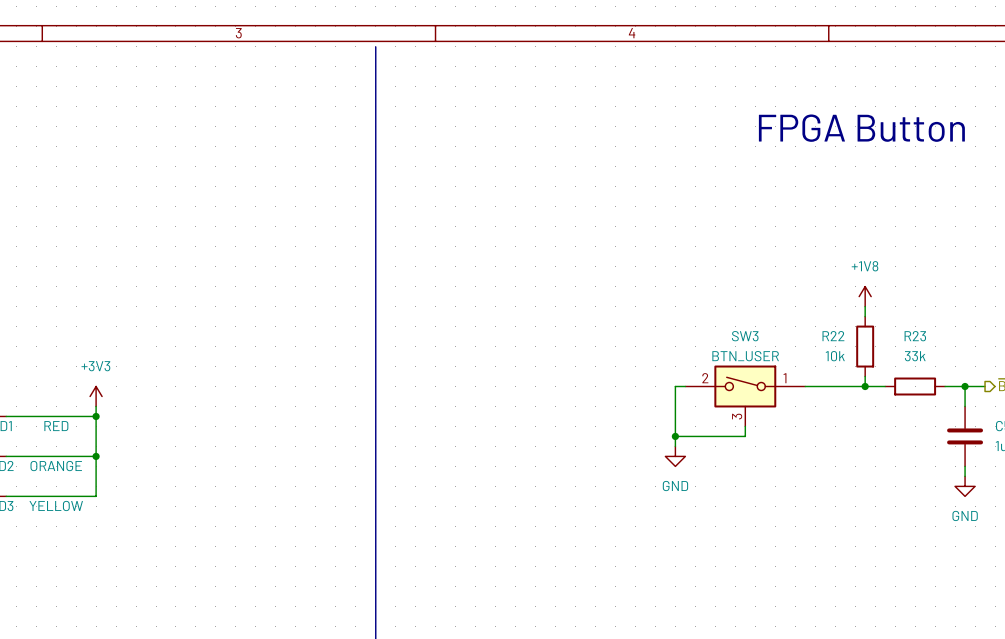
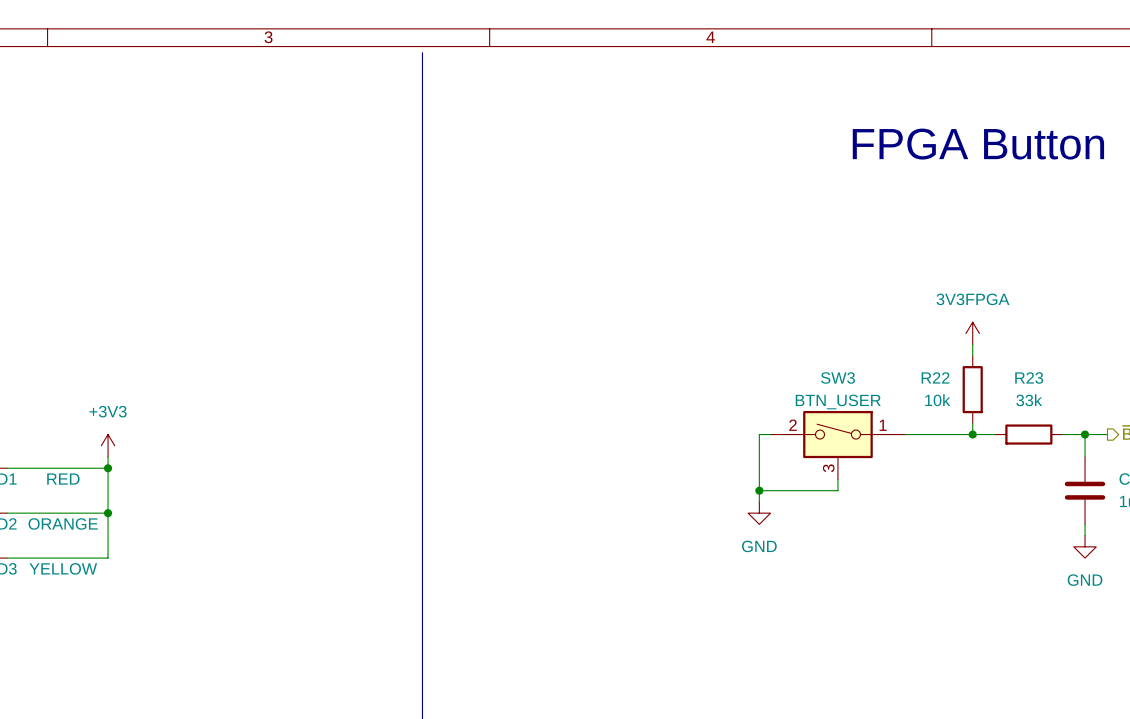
power symbol: +1V8 (865, 296) -> 3V3FPGA (972, 333)

